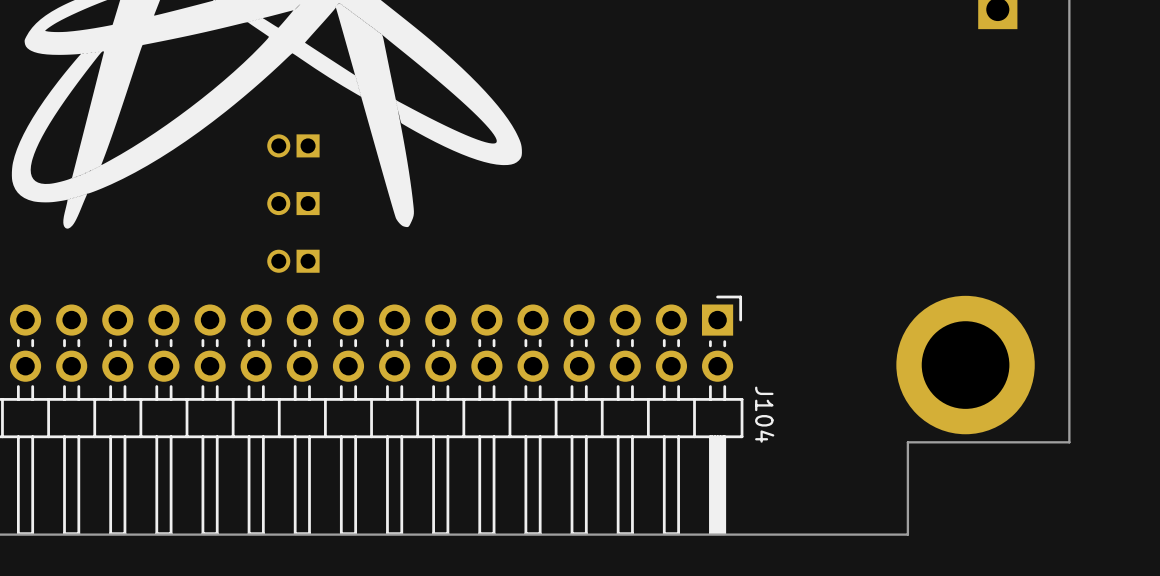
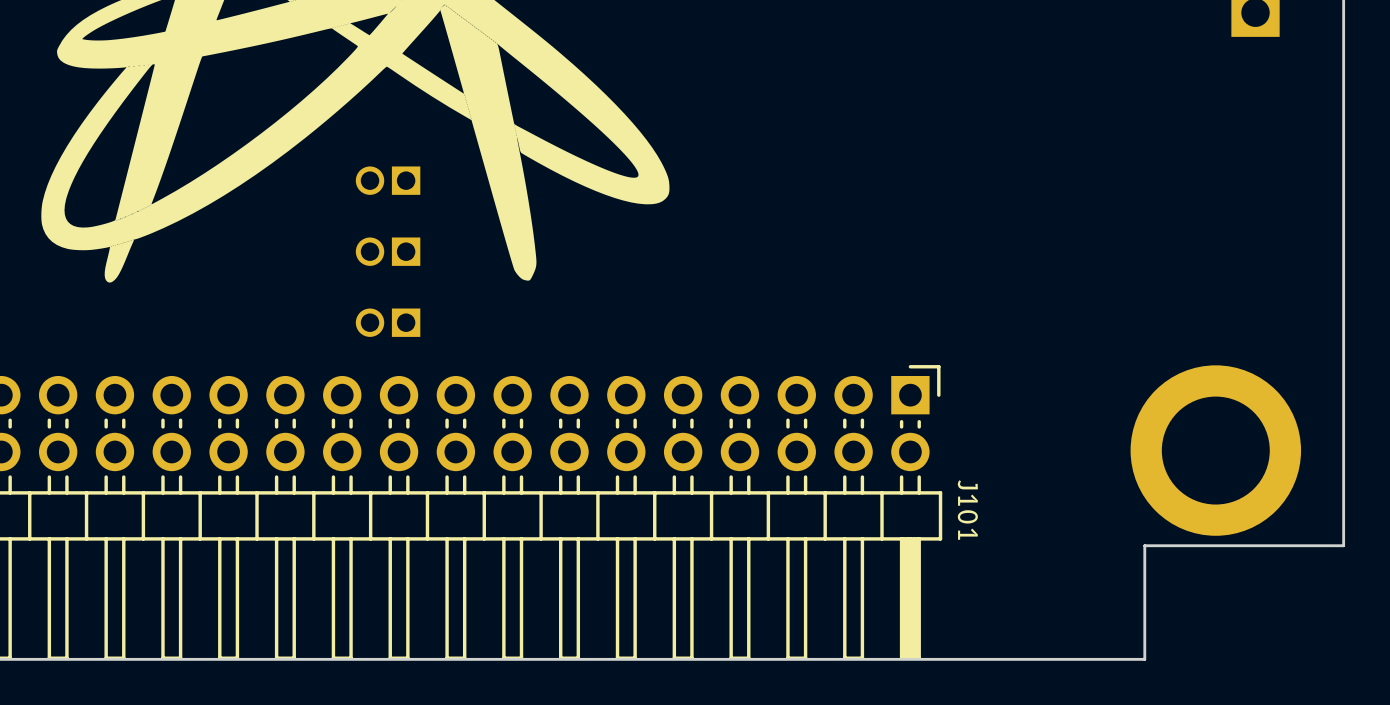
J104 name: J104 (764, 414) -> J101 (967, 510)

